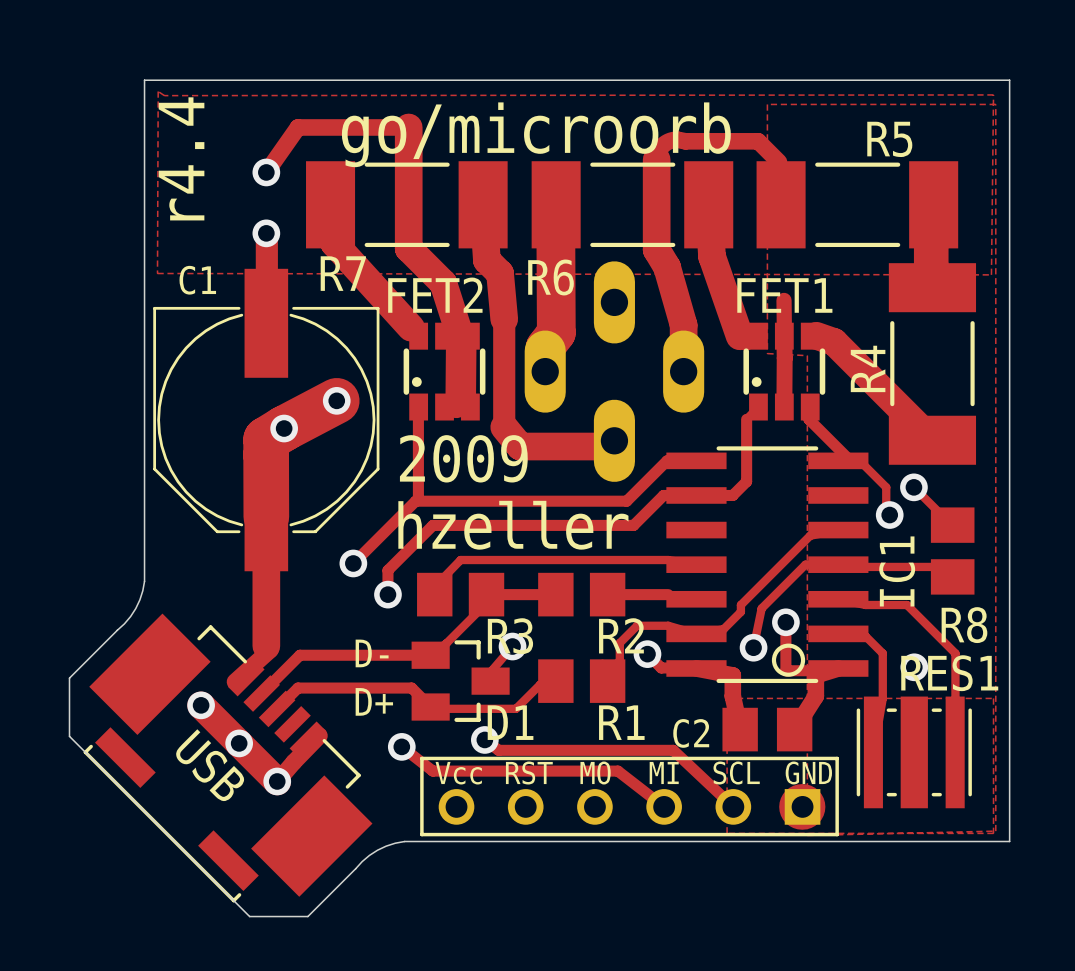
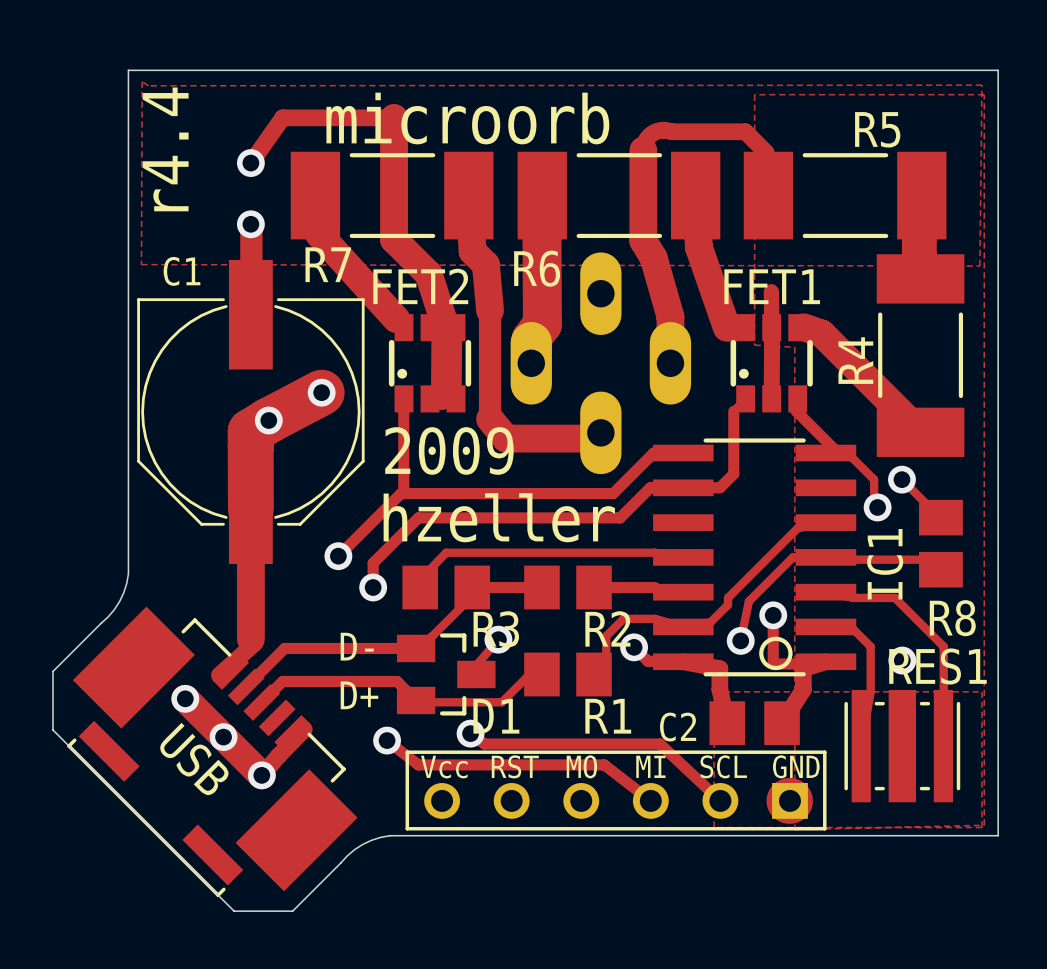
text: go/microorb (536, 134) -> microorb (467, 118)

